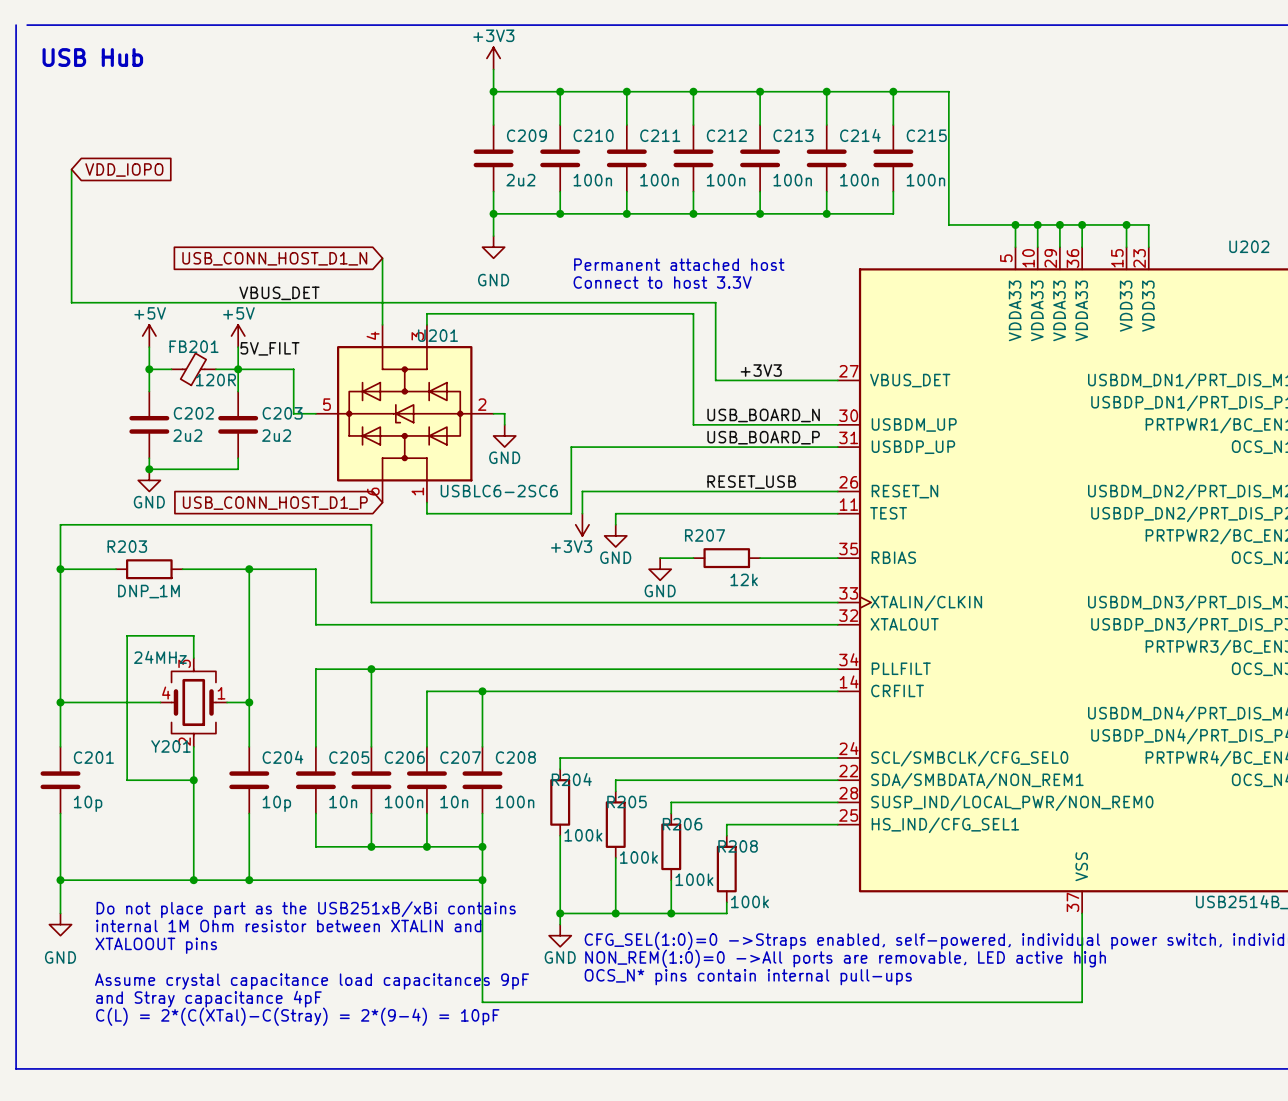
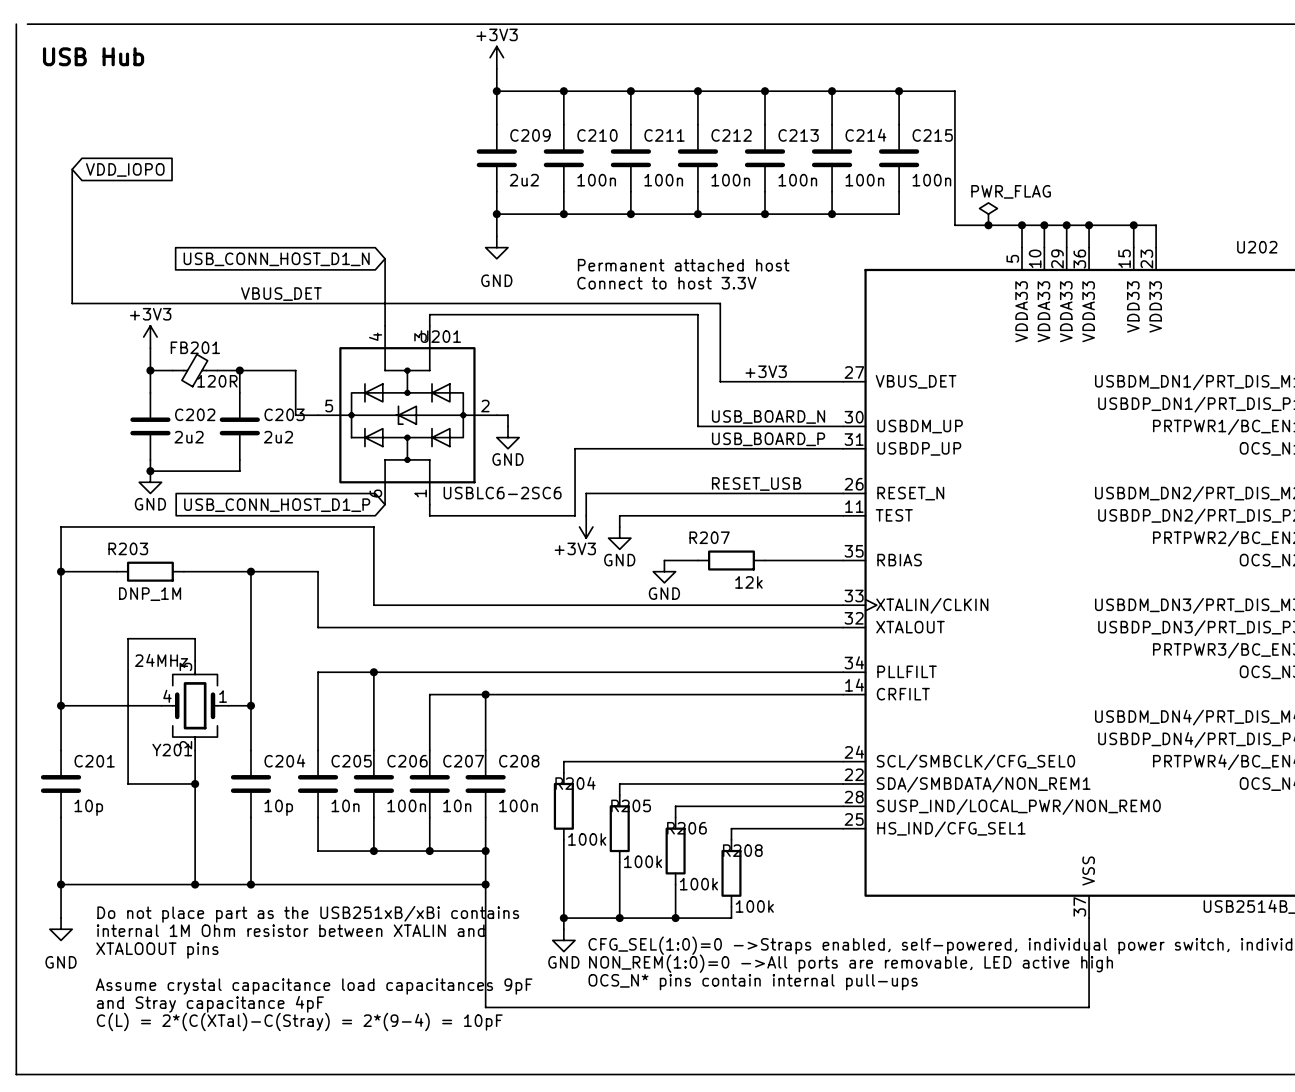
power symbol: none -> PWR_FLAG (988, 214)
junction: none -> (988, 225)
power symbol: +5V (149, 336) -> +3V3 (150, 337)
power symbol: +5V (238, 336) -> none
wire: (238, 347) (238, 369) -> none
label: 5V_FILT (269, 348) -> none

